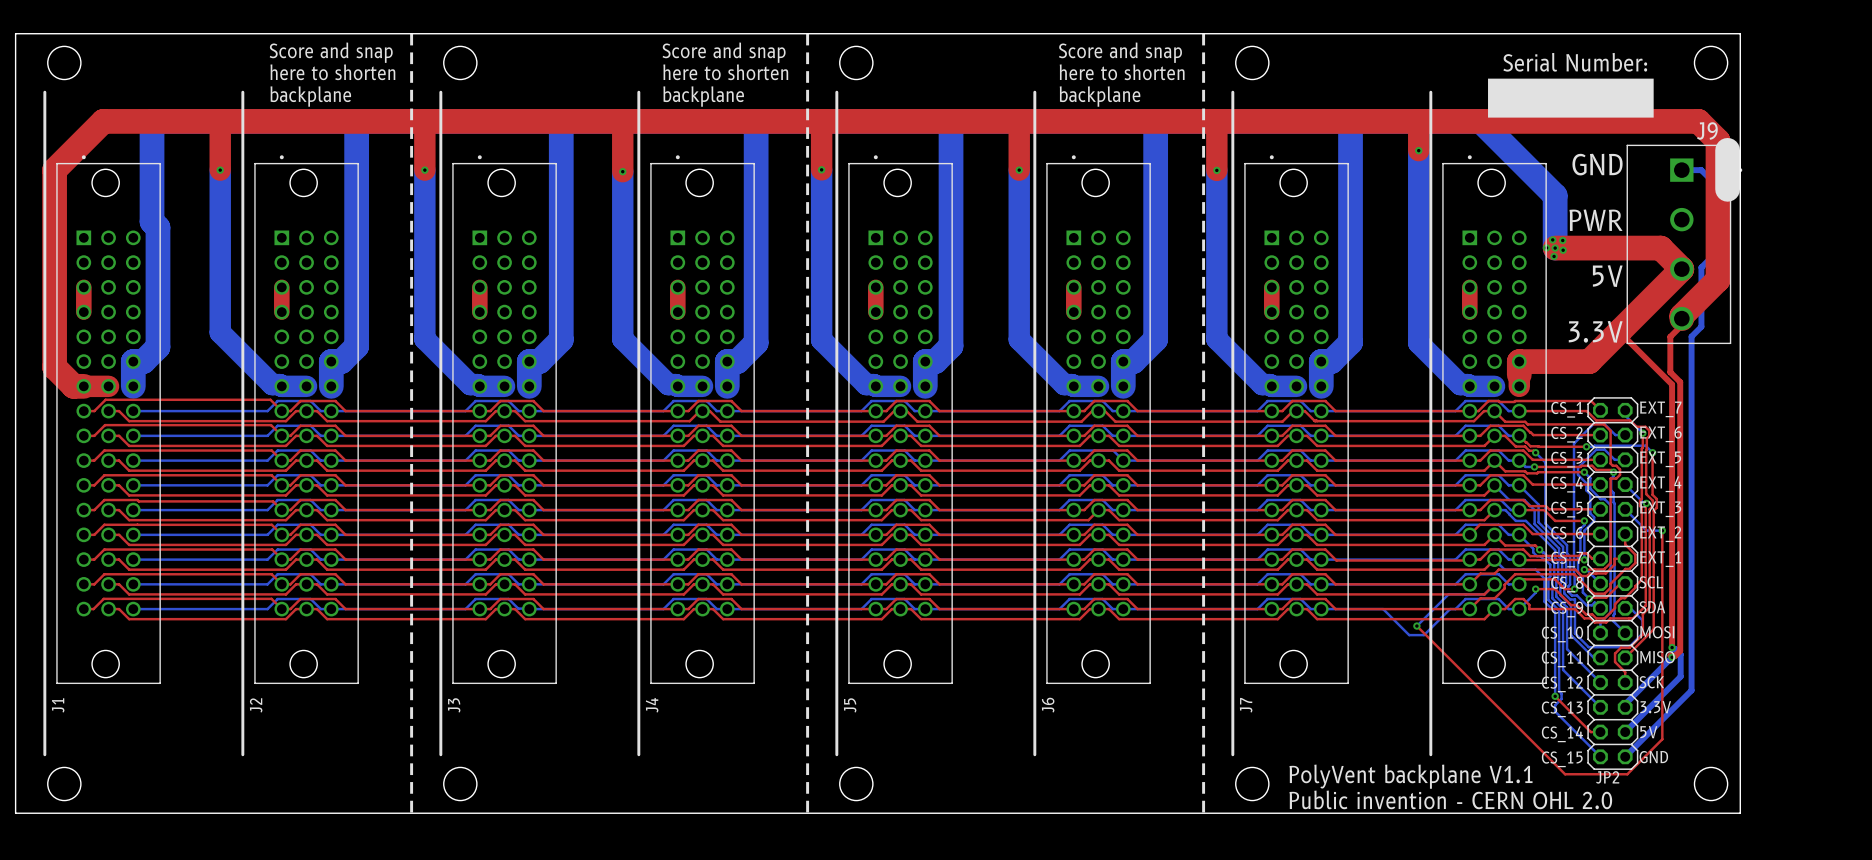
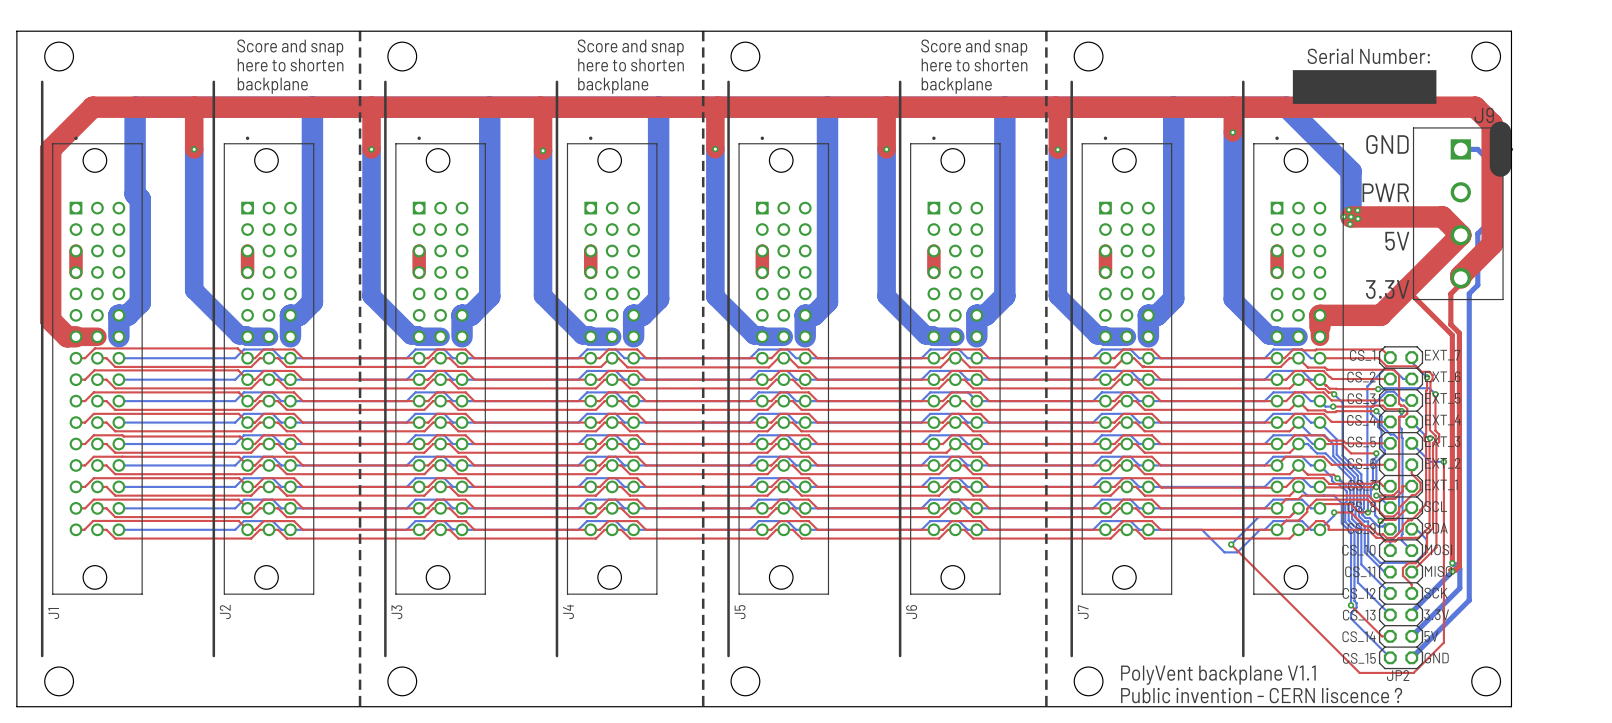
text: Public invention - CERN OHL 2.0 (1450, 799) -> Public invention - CERN liscence ? (1261, 695)

